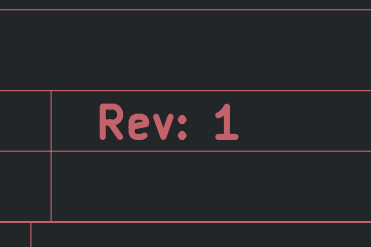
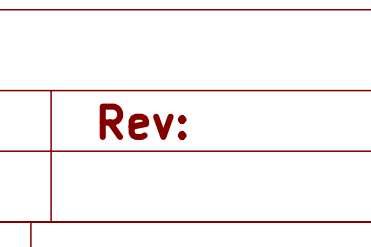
title block: Rev: 1 (169, 121) -> Rev: (143, 121)

